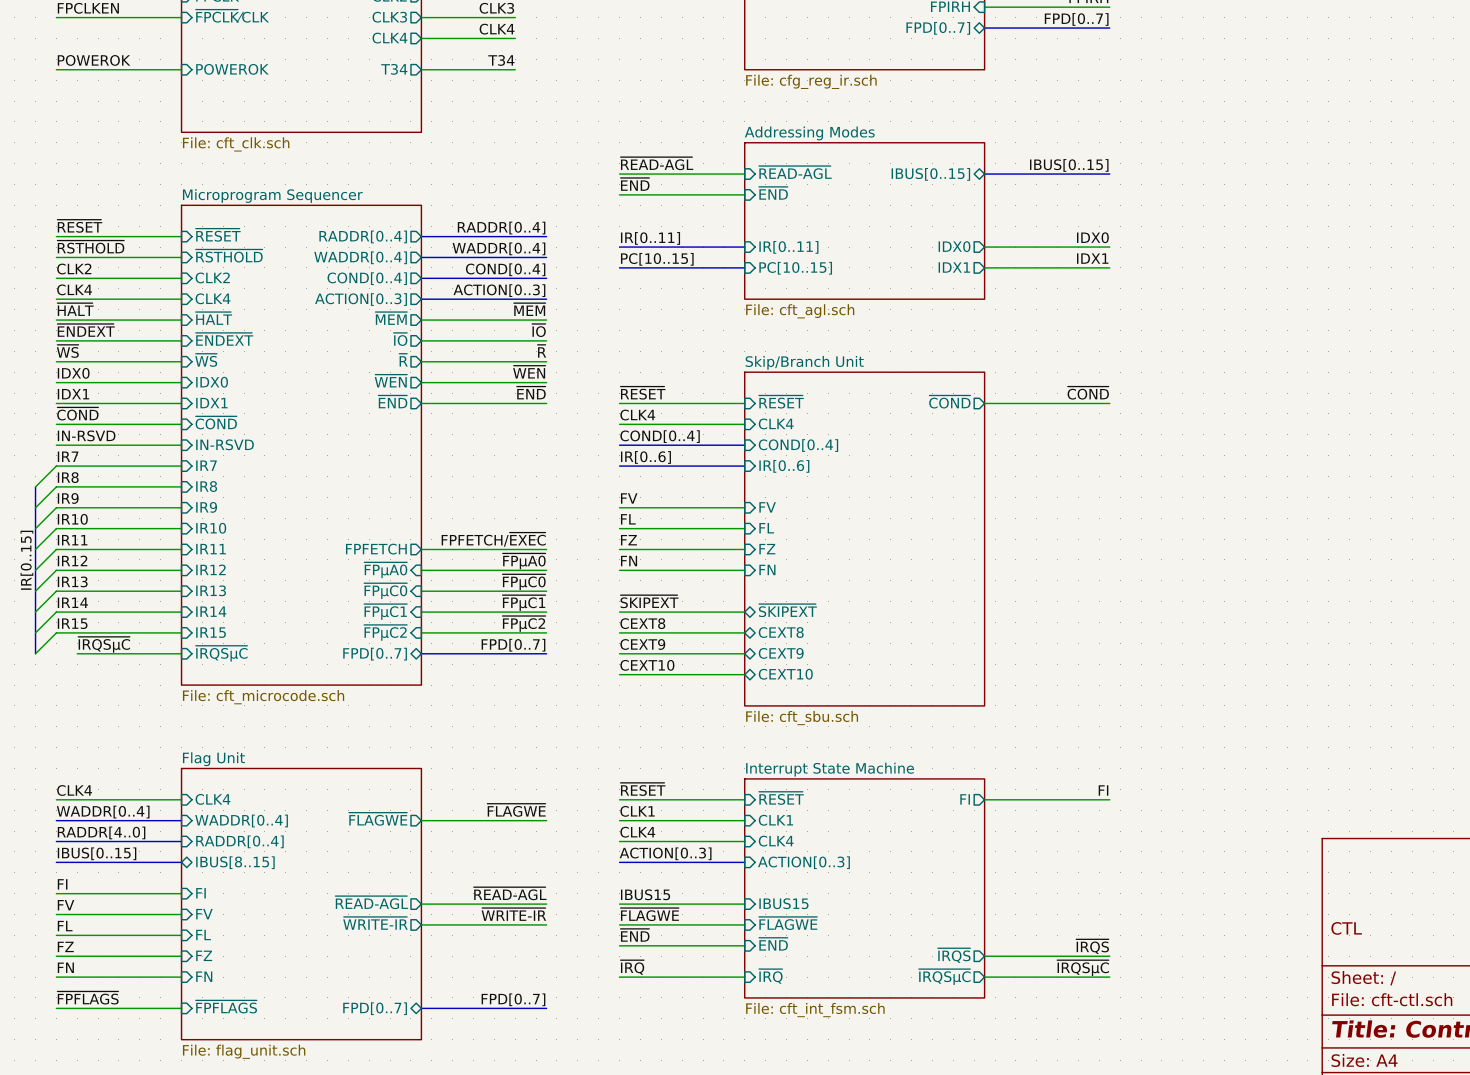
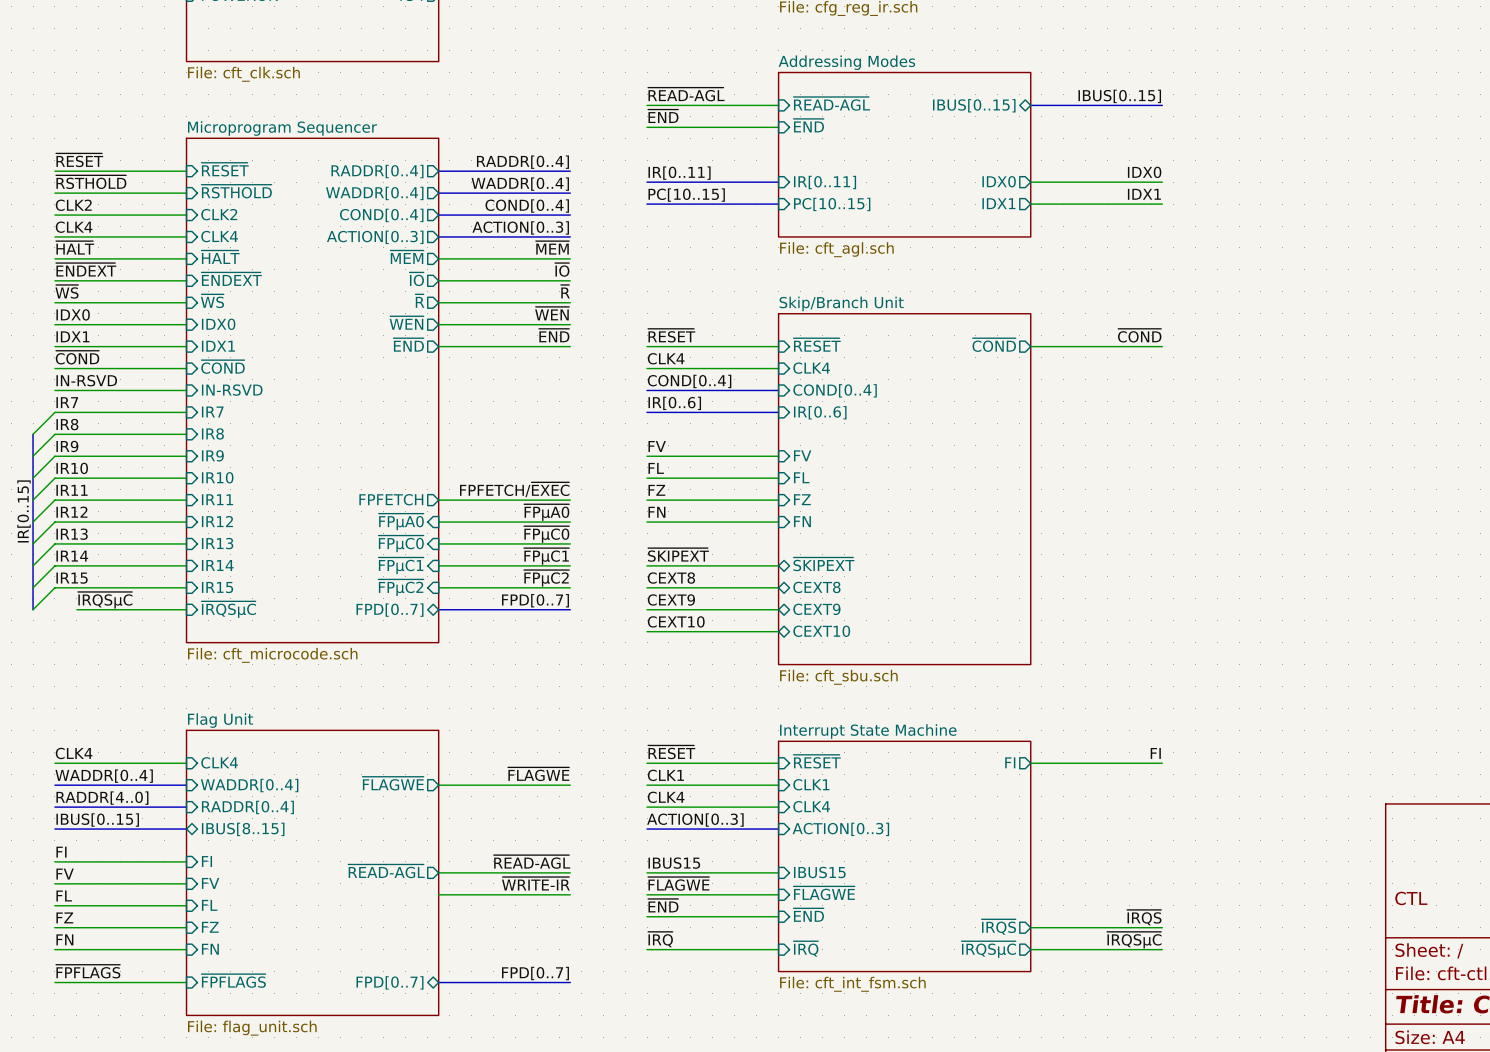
sheet pin: ~{WRITE-IR} (375, 923) -> none

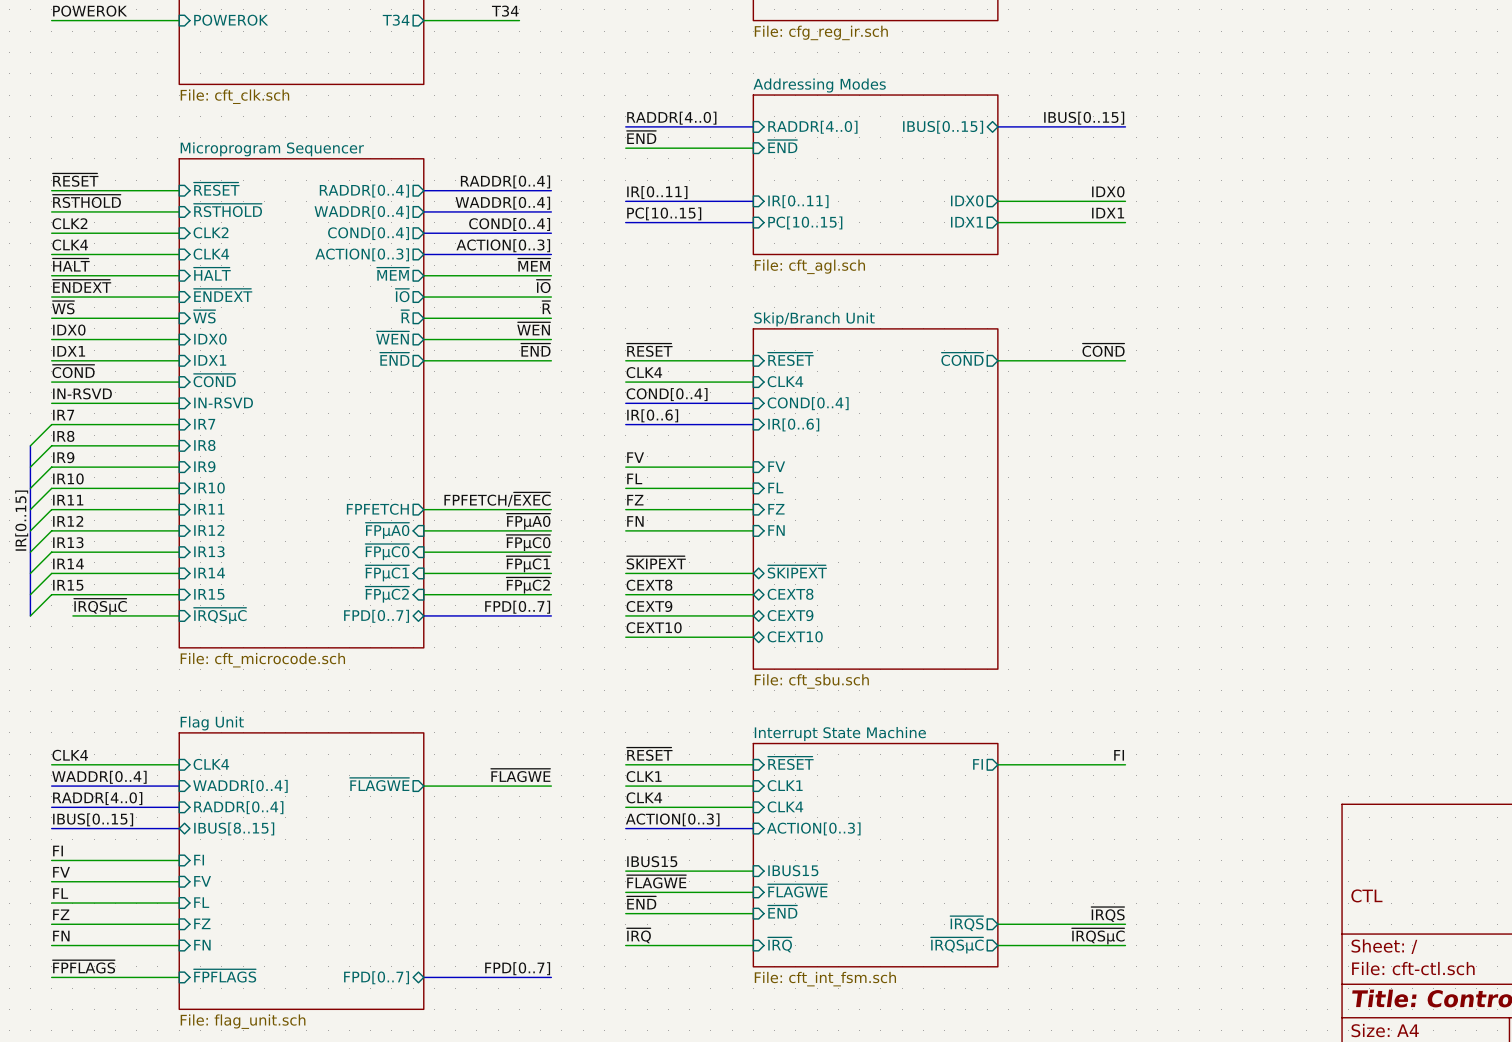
label: ~{READ-AGL} (686, 94) -> RADDR[4..0] (671, 118)
sheet pin: ~{READ-AGL} (831, 103) -> RADDR[4..0] (812, 127)
bus: none -> (625, 126) (753, 126)
label: ~{READ-AGL} (531, 861) -> none
sheet pin: ~{READ-AGL} (386, 871) -> none
wire: (438, 872) (570, 872) -> none
label: ~{WRITE-IR} (535, 883) -> none
wire: (438, 894) (570, 894) -> none

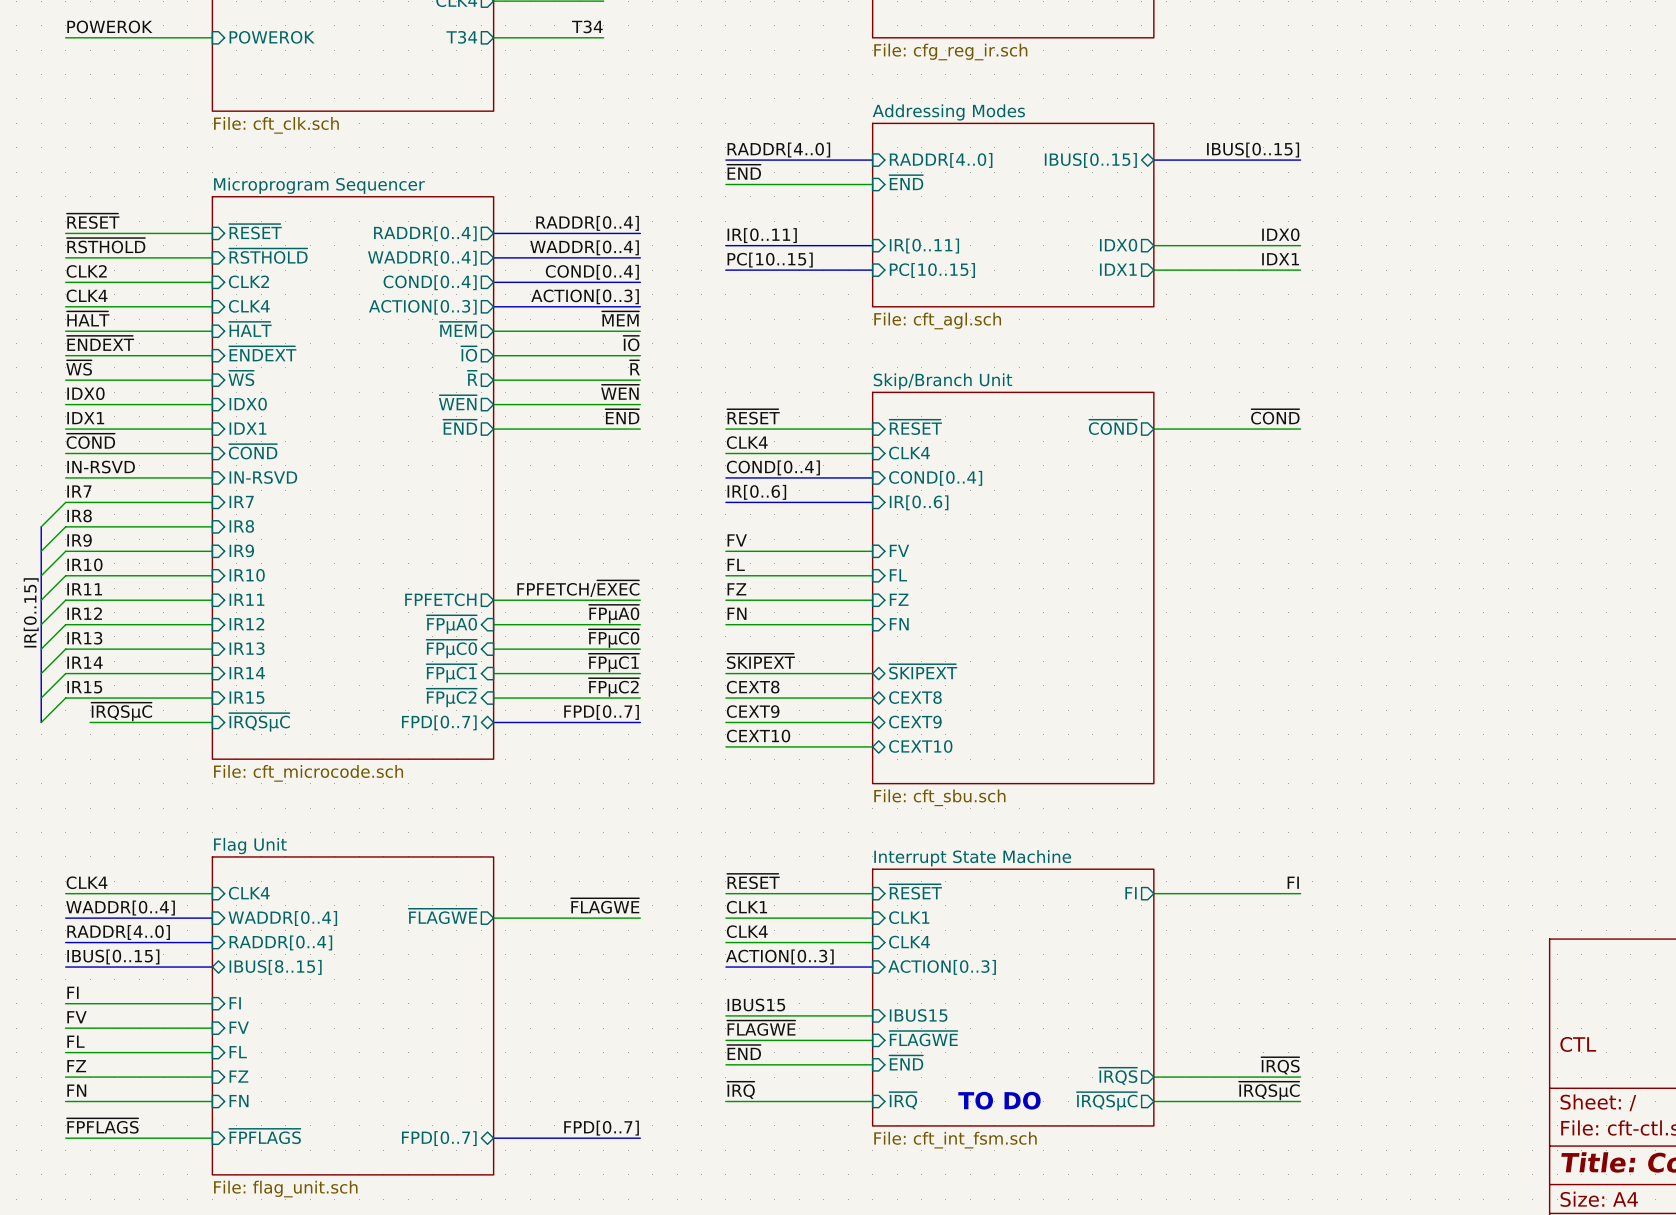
text: none -> TO DO (999, 1100)

